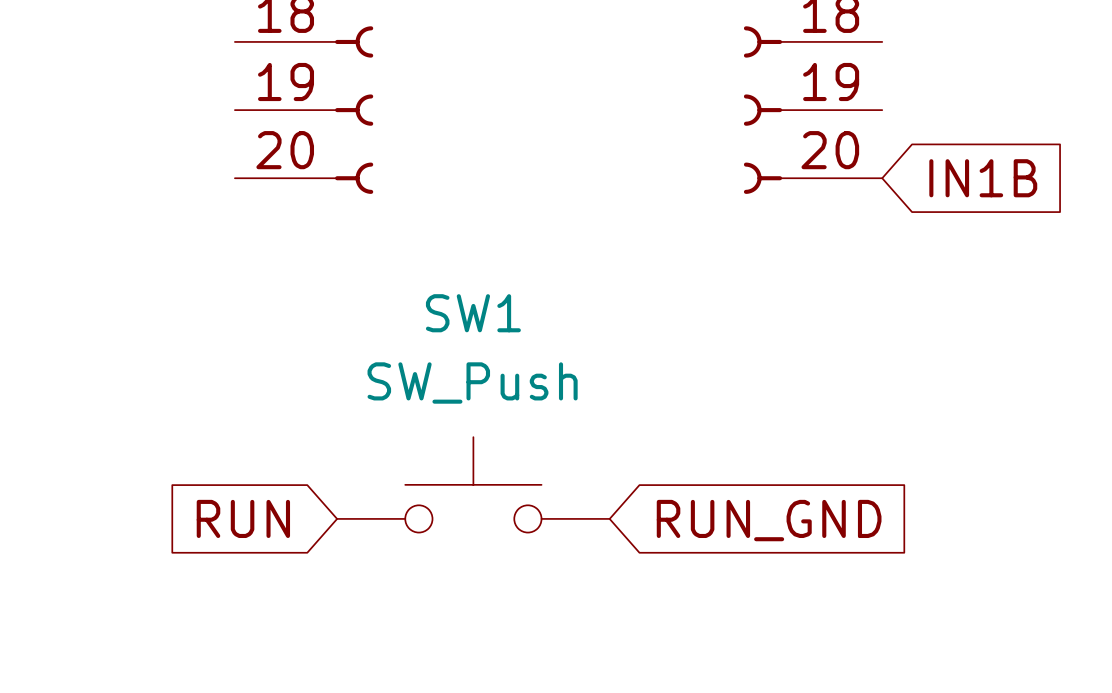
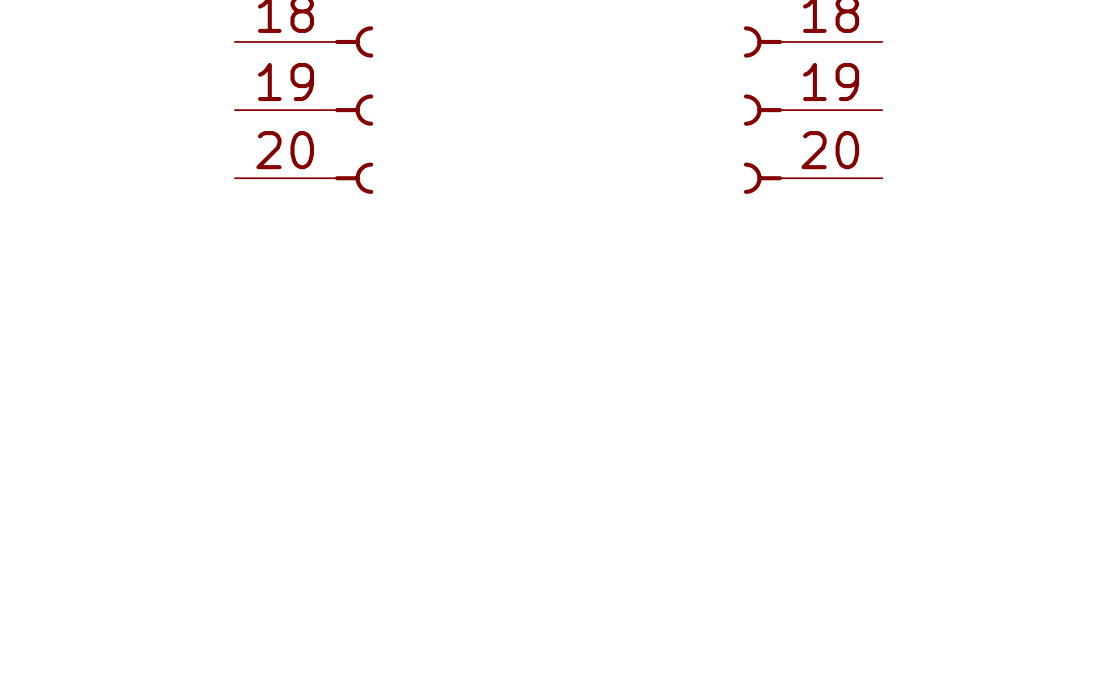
global label: IN1B (983, 178) -> none
SW1: SW_Push (473, 484) -> none
global label: RUN (243, 518) -> none
global label: RUN_GND (769, 520) -> none

